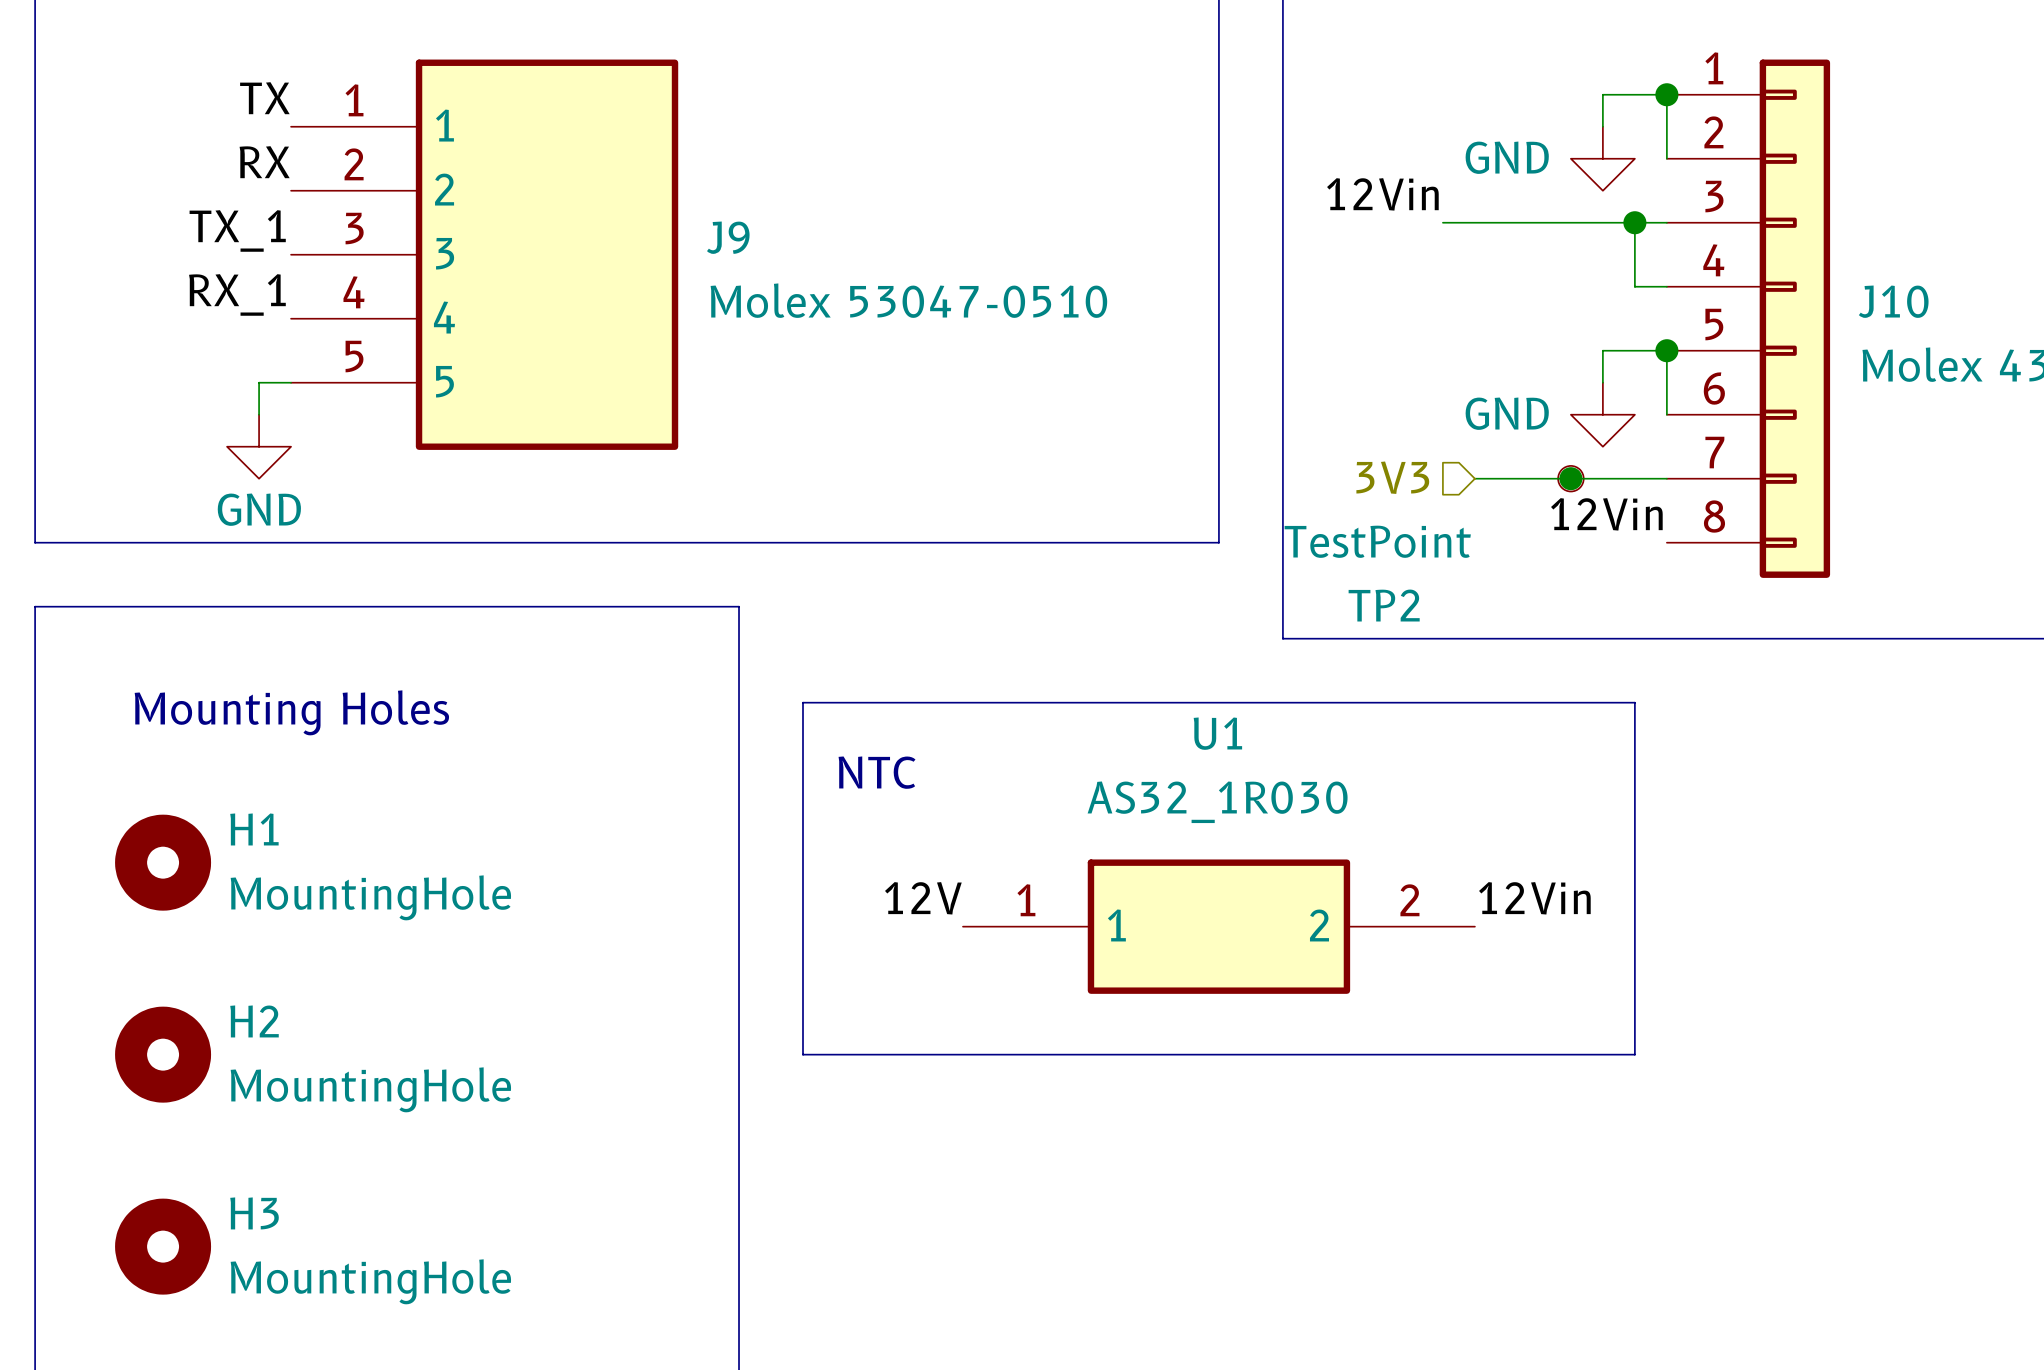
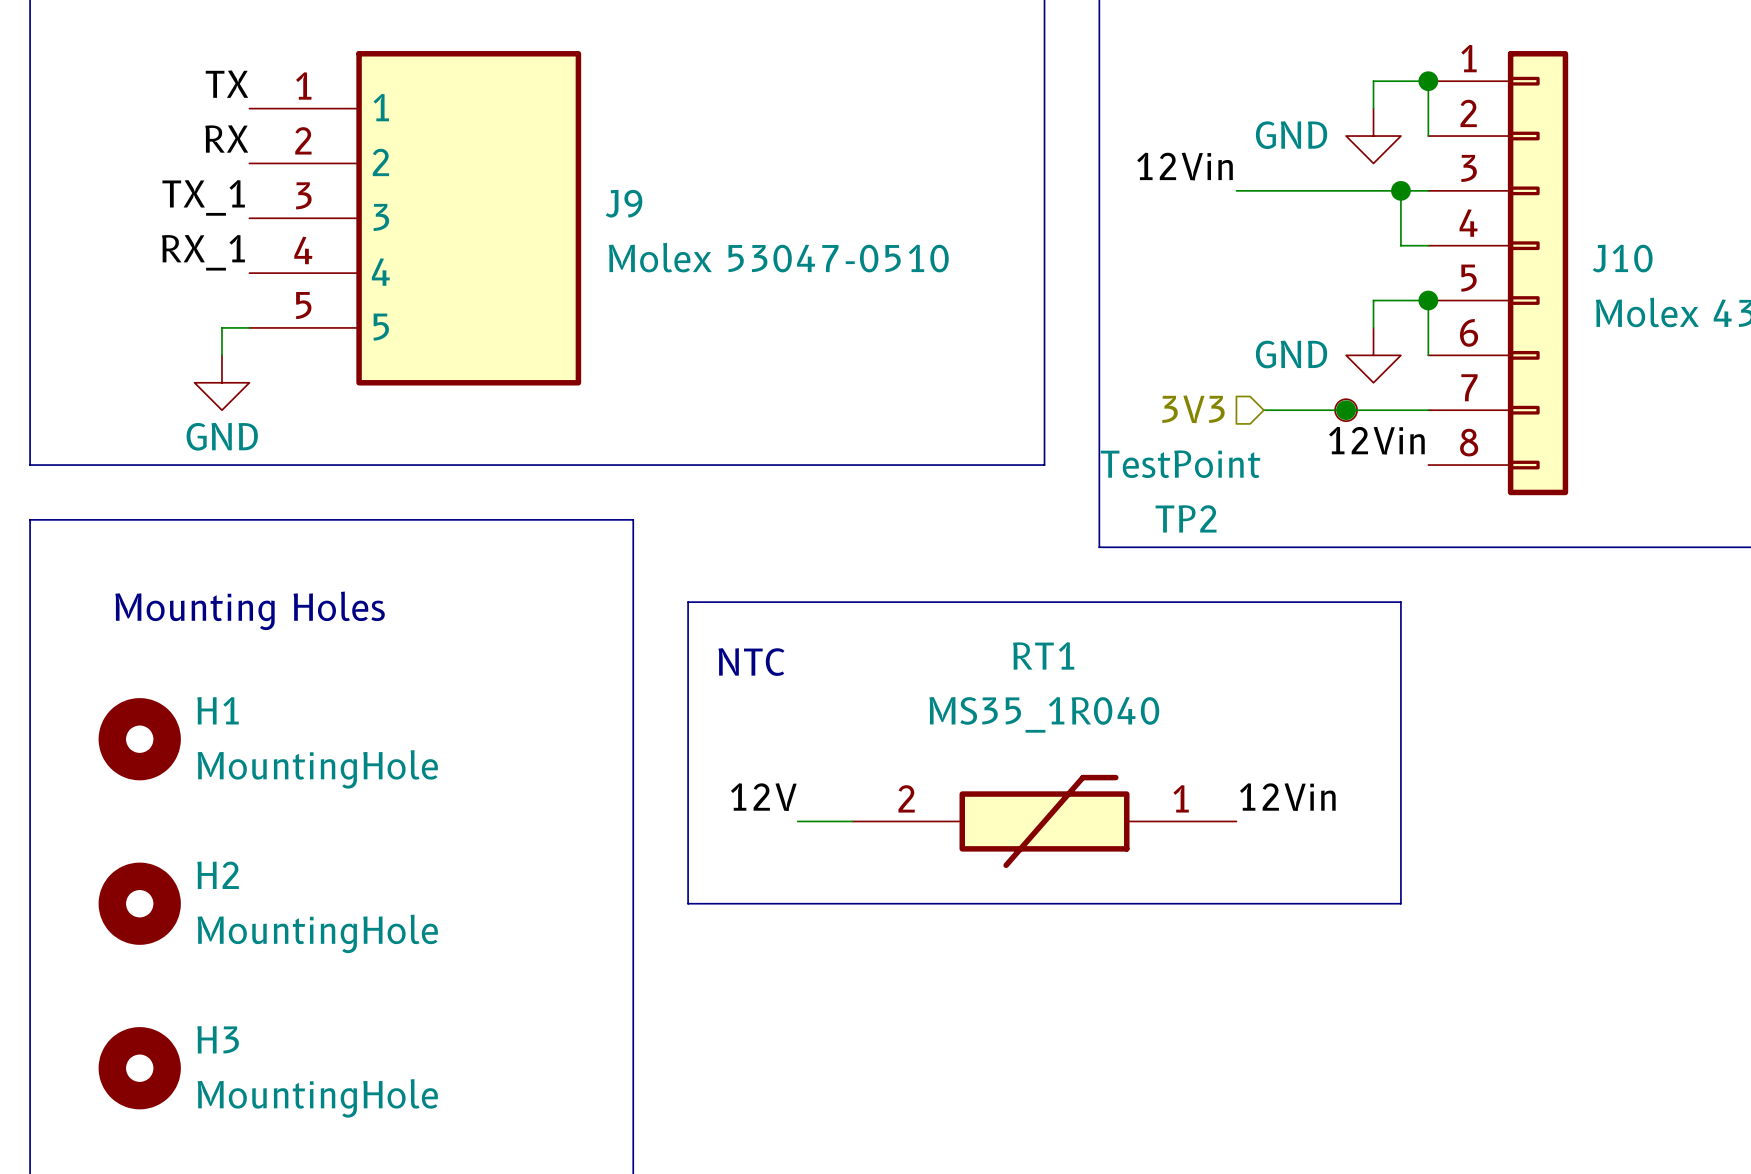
label position: 12V (923, 898) -> 12V (763, 797)
label position: 12Vin (1534, 898) -> 12Vin (1287, 797)
U1: AS32_1R030 (1218, 926) -> none
wire: none -> (797, 821) (852, 821)
RT1: none -> MS35_1R040 (1044, 821)

